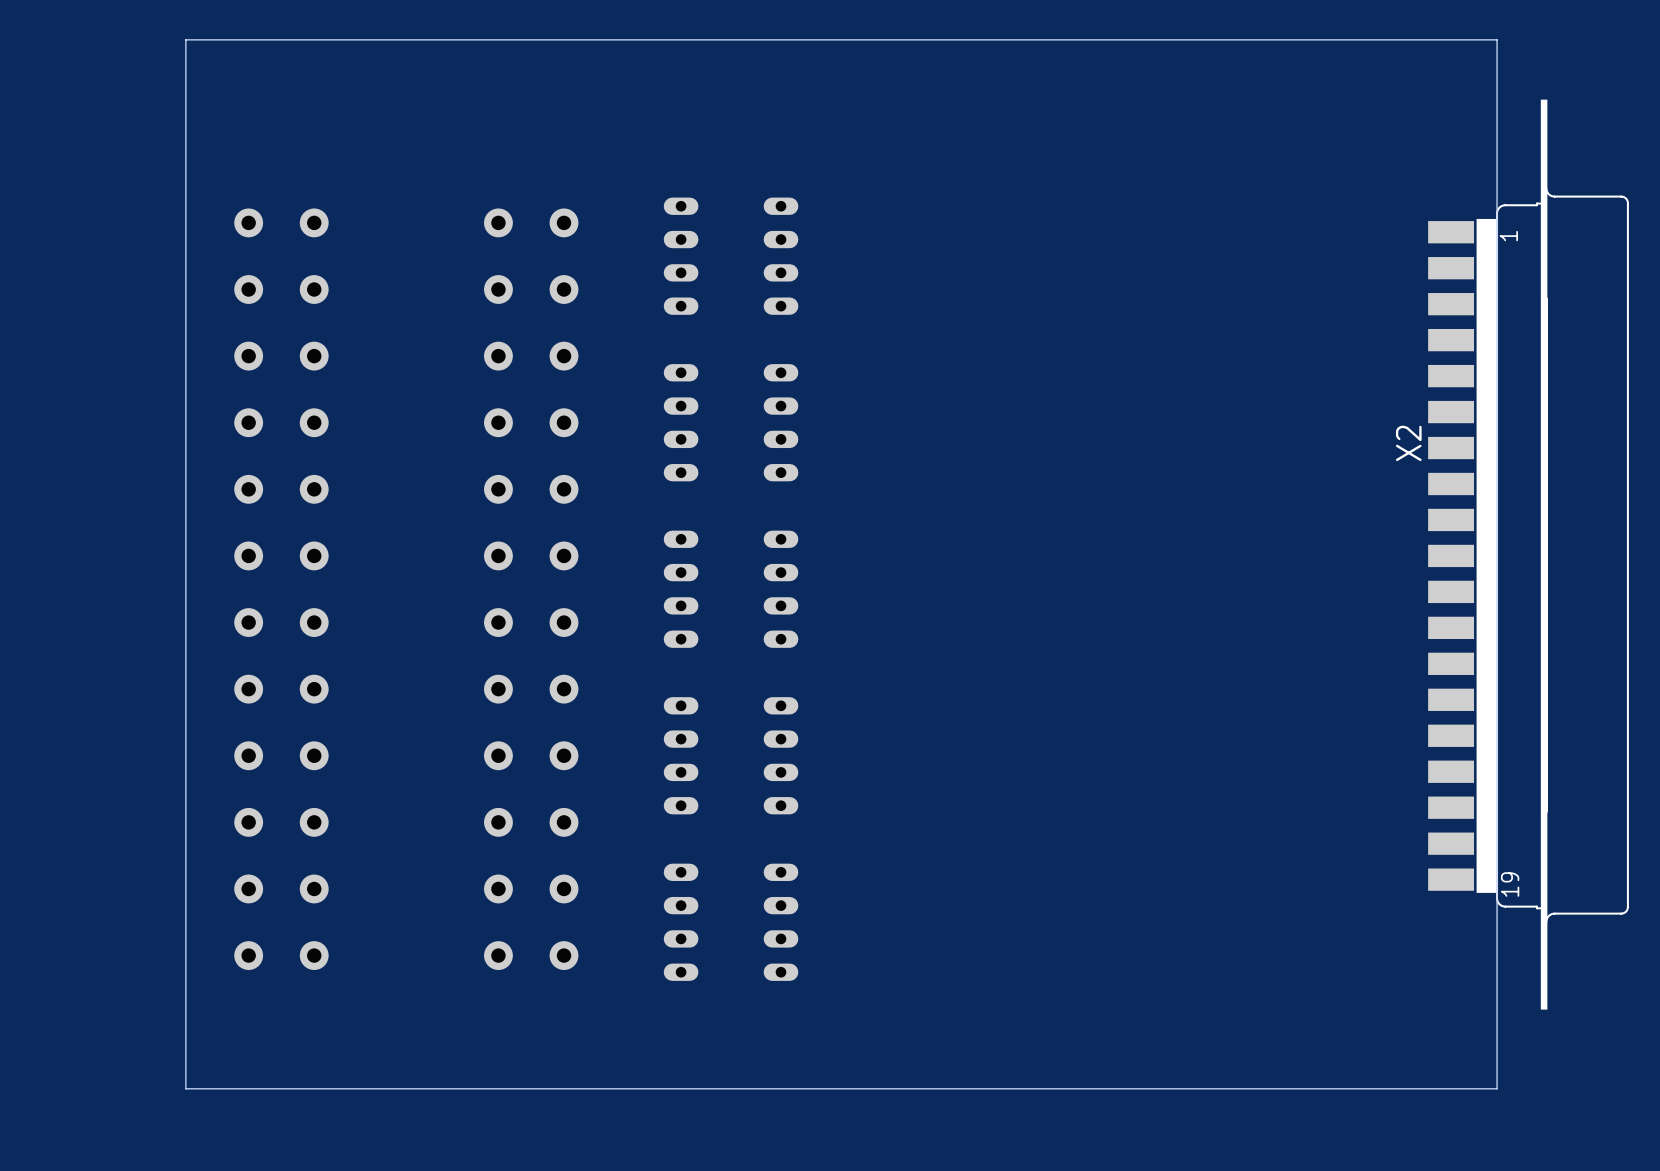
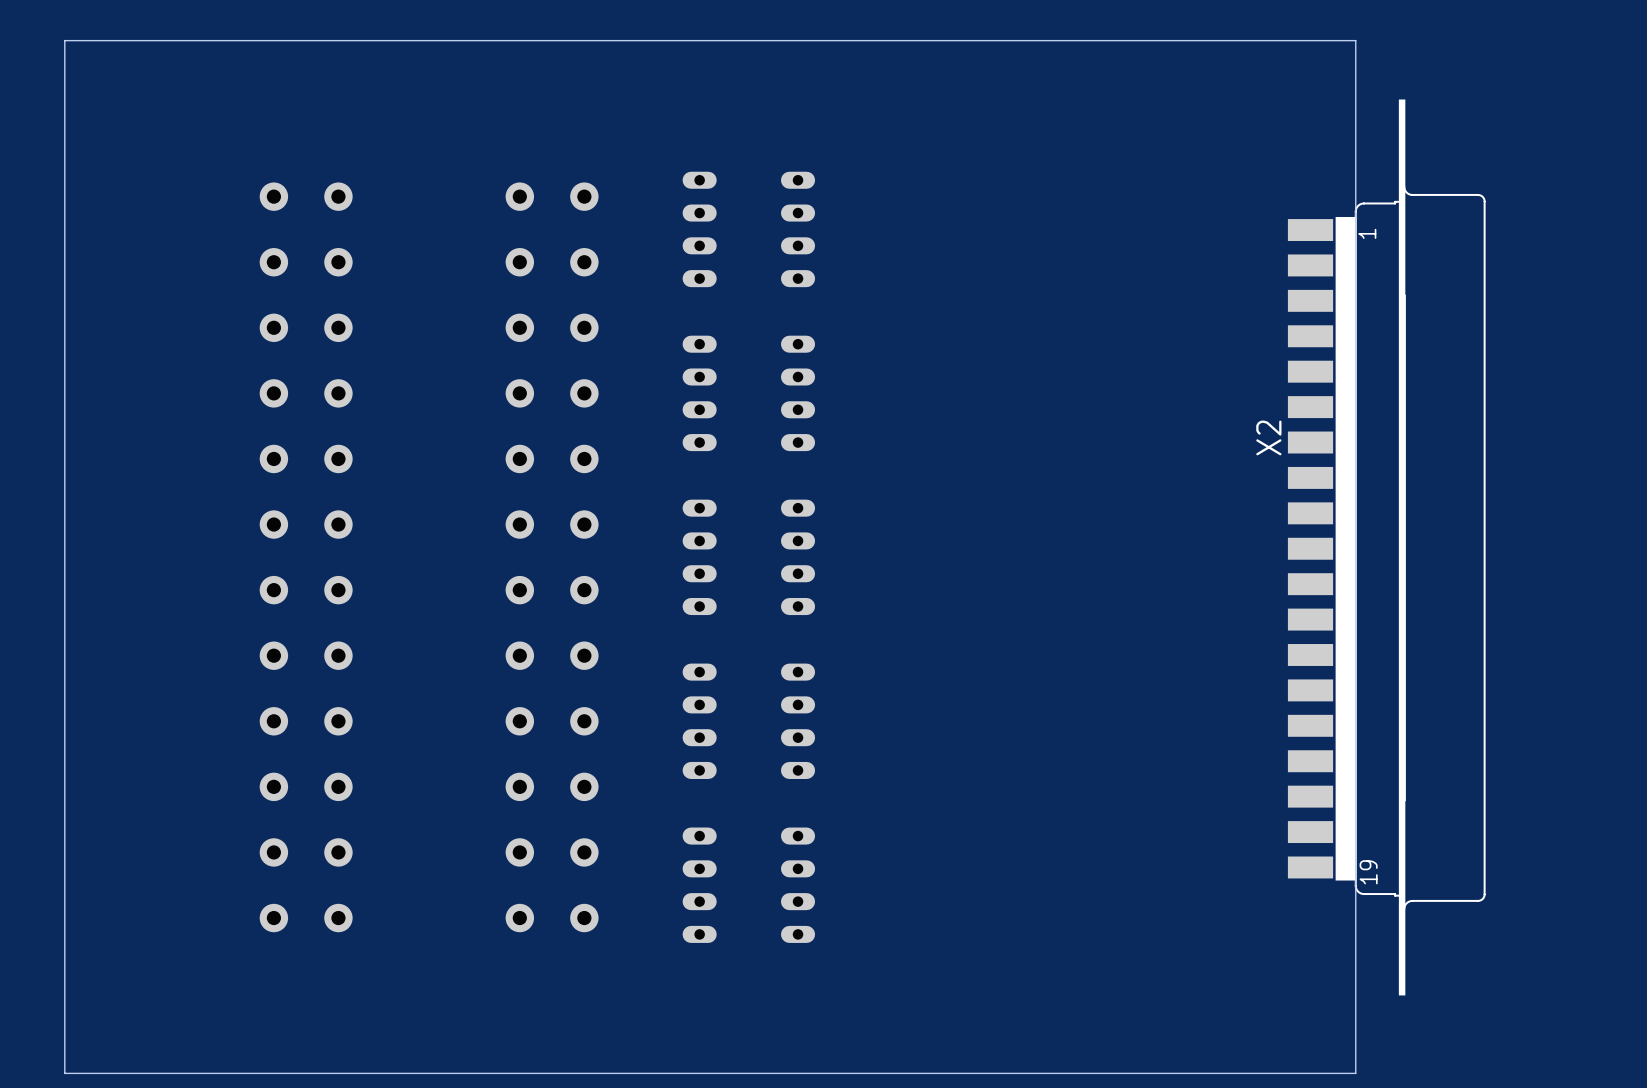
board edge: (1497, 39) (185, 39) (185, 1088) (1497, 1088) (1497, 39) -> (1355, 40) (1355, 1073) (64, 1073) (64, 40) (1355, 40)
X2 position: (1528, 554) -> (1386, 547)

